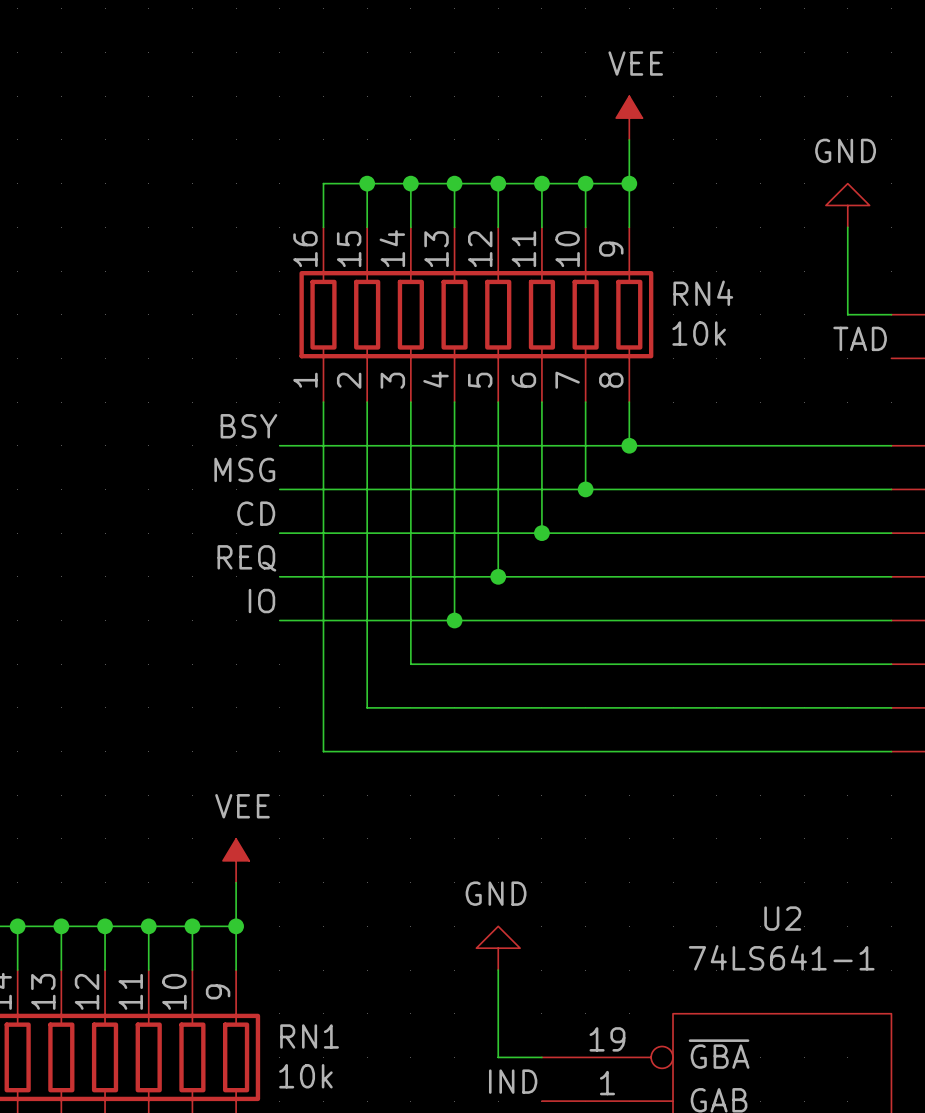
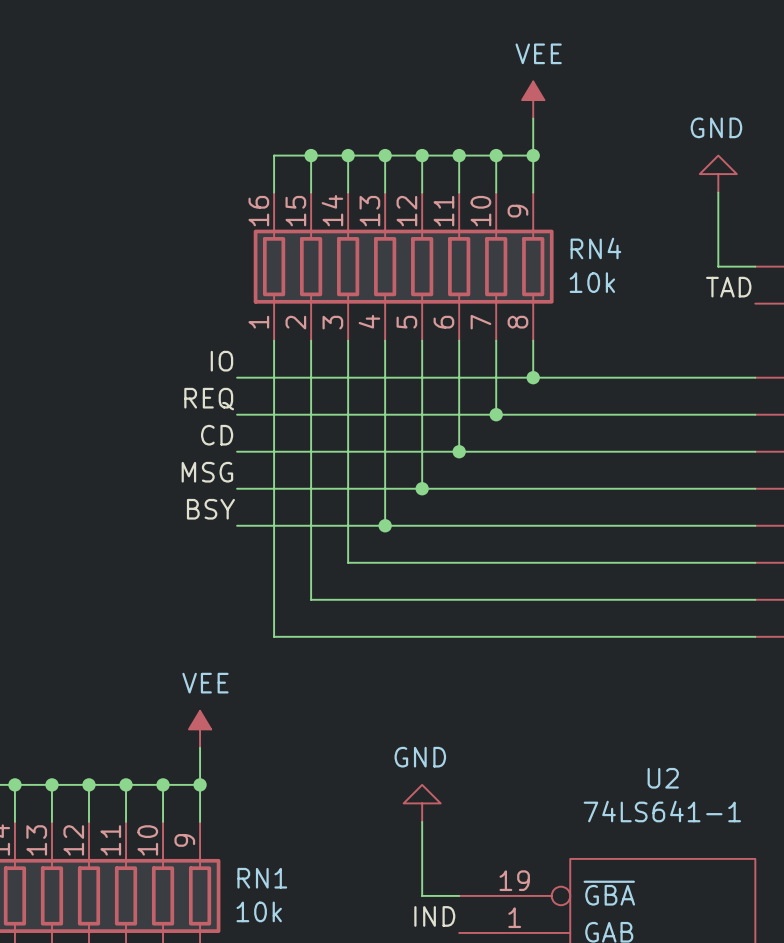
label: BSY (248, 426) -> IO (221, 361)
label: MSG (244, 469) -> REQ (209, 399)
label: REQ (246, 558) -> MSG (207, 472)
label: IO (261, 601) -> BSY (210, 509)

